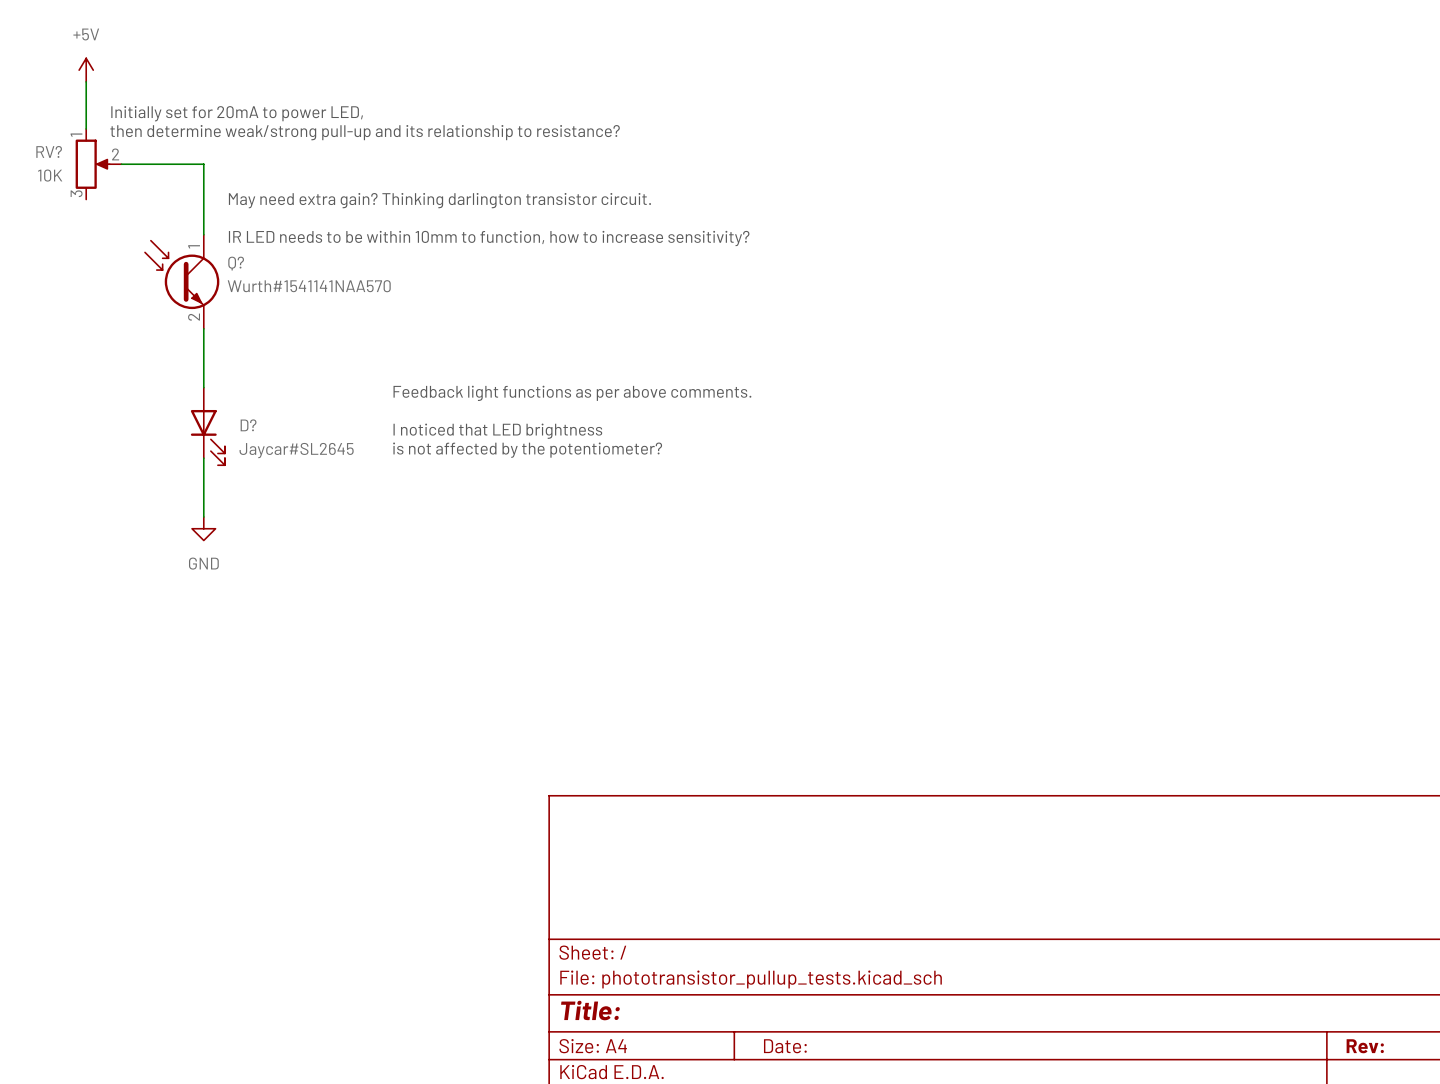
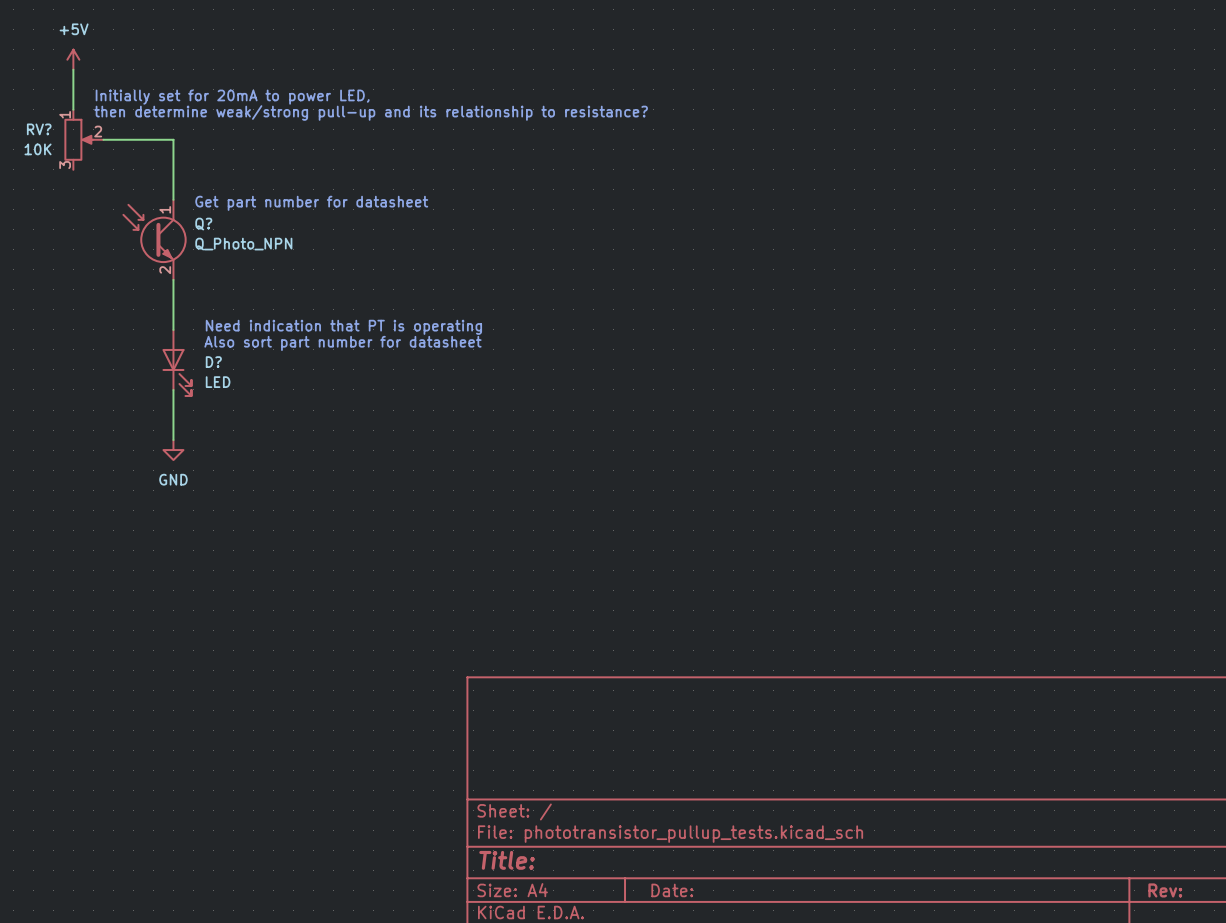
text: May need extra gain? Thinking darlington transistor circuit. (439, 200) -> none
text: IR LED needs to be within 10mm to function, how to increase sensitivity? (489, 238) -> Get part number for datasheet (311, 203)
Q? value: Wurth#1541141NAA570 (309, 286) -> Q_Photo_NPN (243, 244)
text: none -> Need indication that PT is operating (343, 327)
text: Feedback light functions as per above comments. (572, 393) -> none
text: none -> Also sort part number for datasheet (342, 343)
text: I noticed that LED brightness (497, 431) -> none
D? value: Jaycar#SL2645 (296, 450) -> LED (218, 382)
text: is not affected by the potentiometer? (527, 450) -> none

